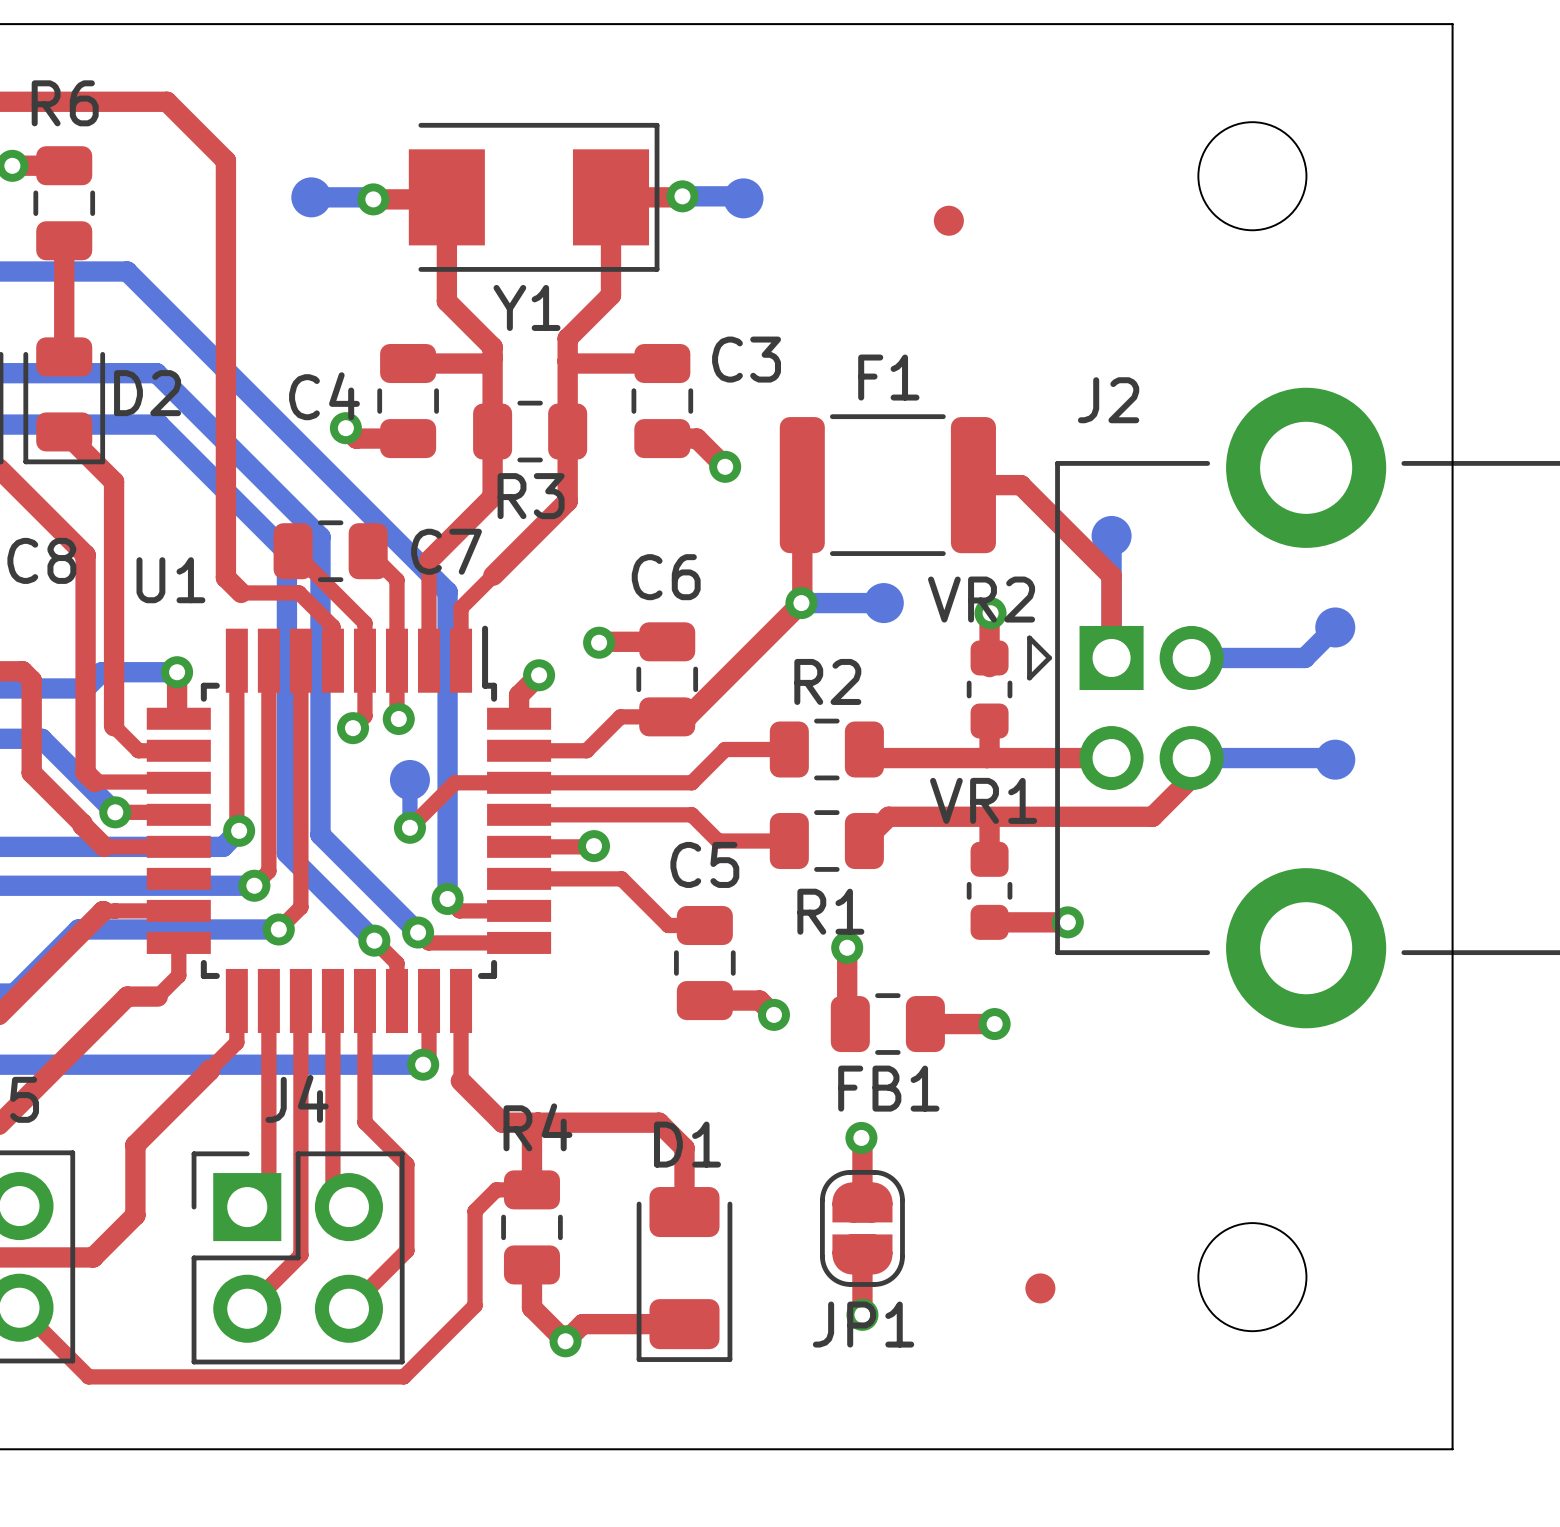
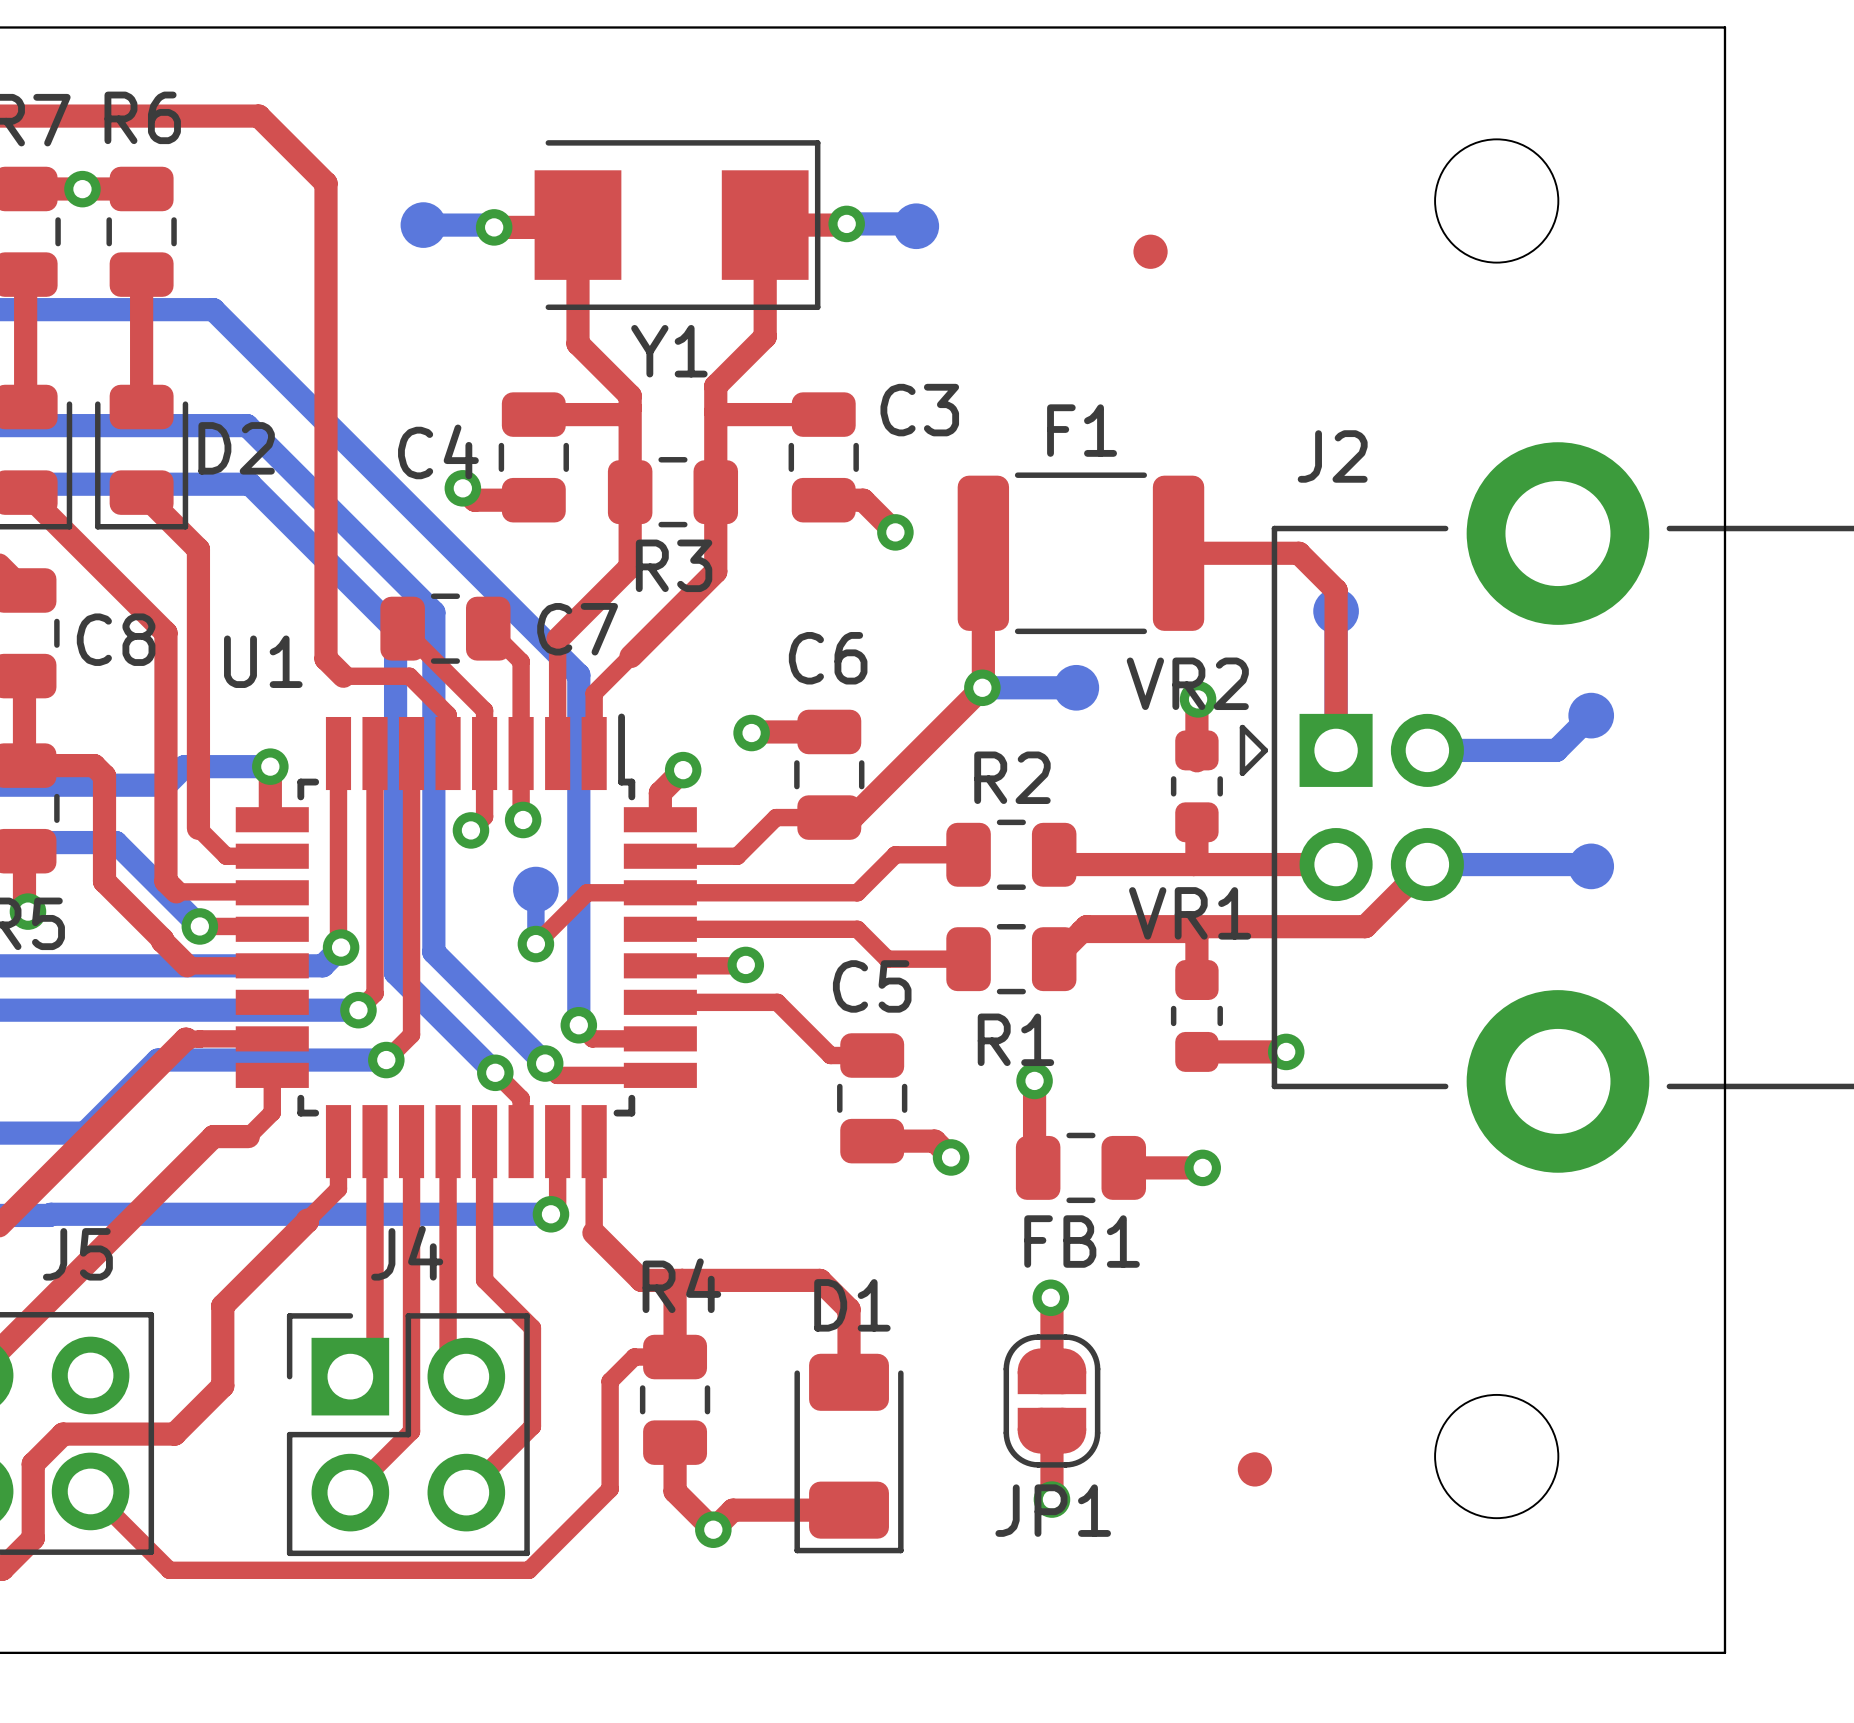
top track: (1020, 485) (1111, 575) -> (1232, 553) (1298, 553) (1336, 590) (1336, 656)
top track: (1191, 758) (1191, 777) (1152, 816) (988, 816) -> (1427, 864) (1365, 926) (1086, 926) (1081, 931)

